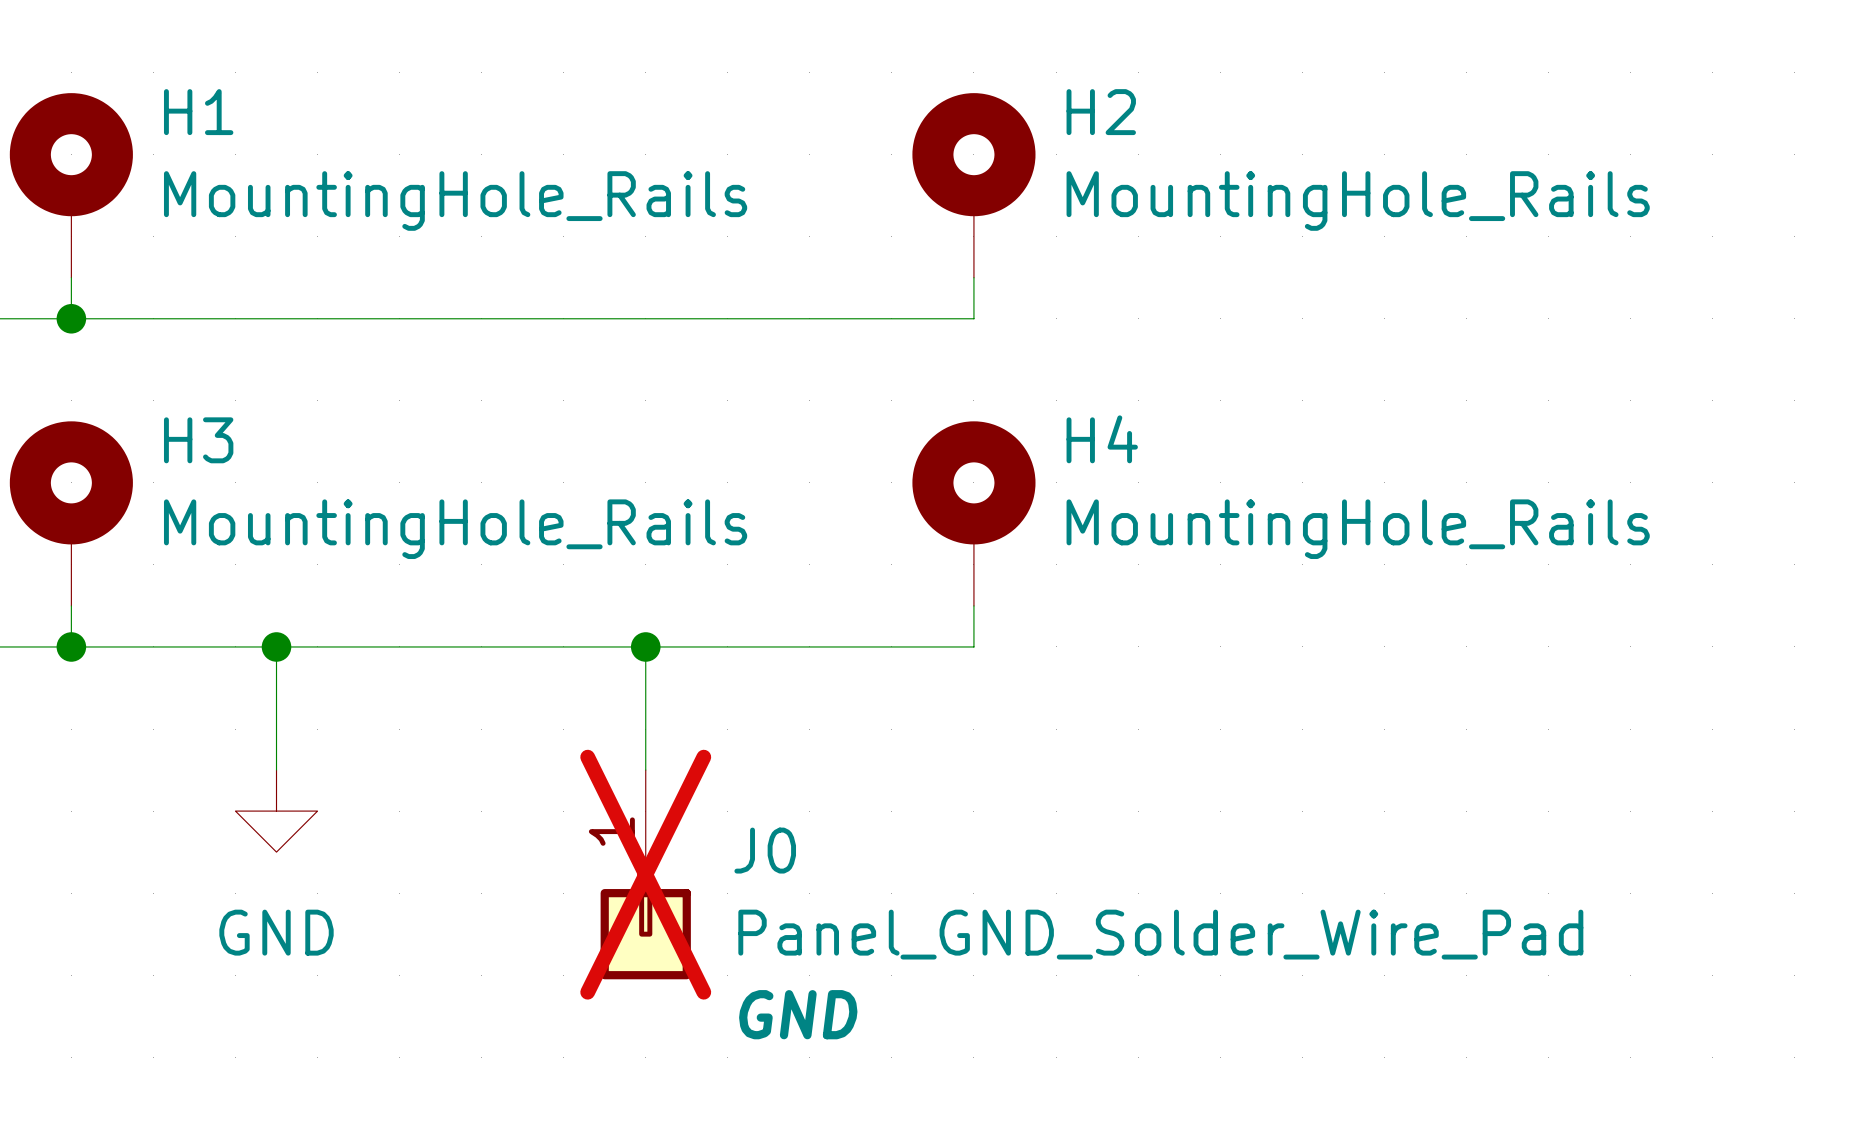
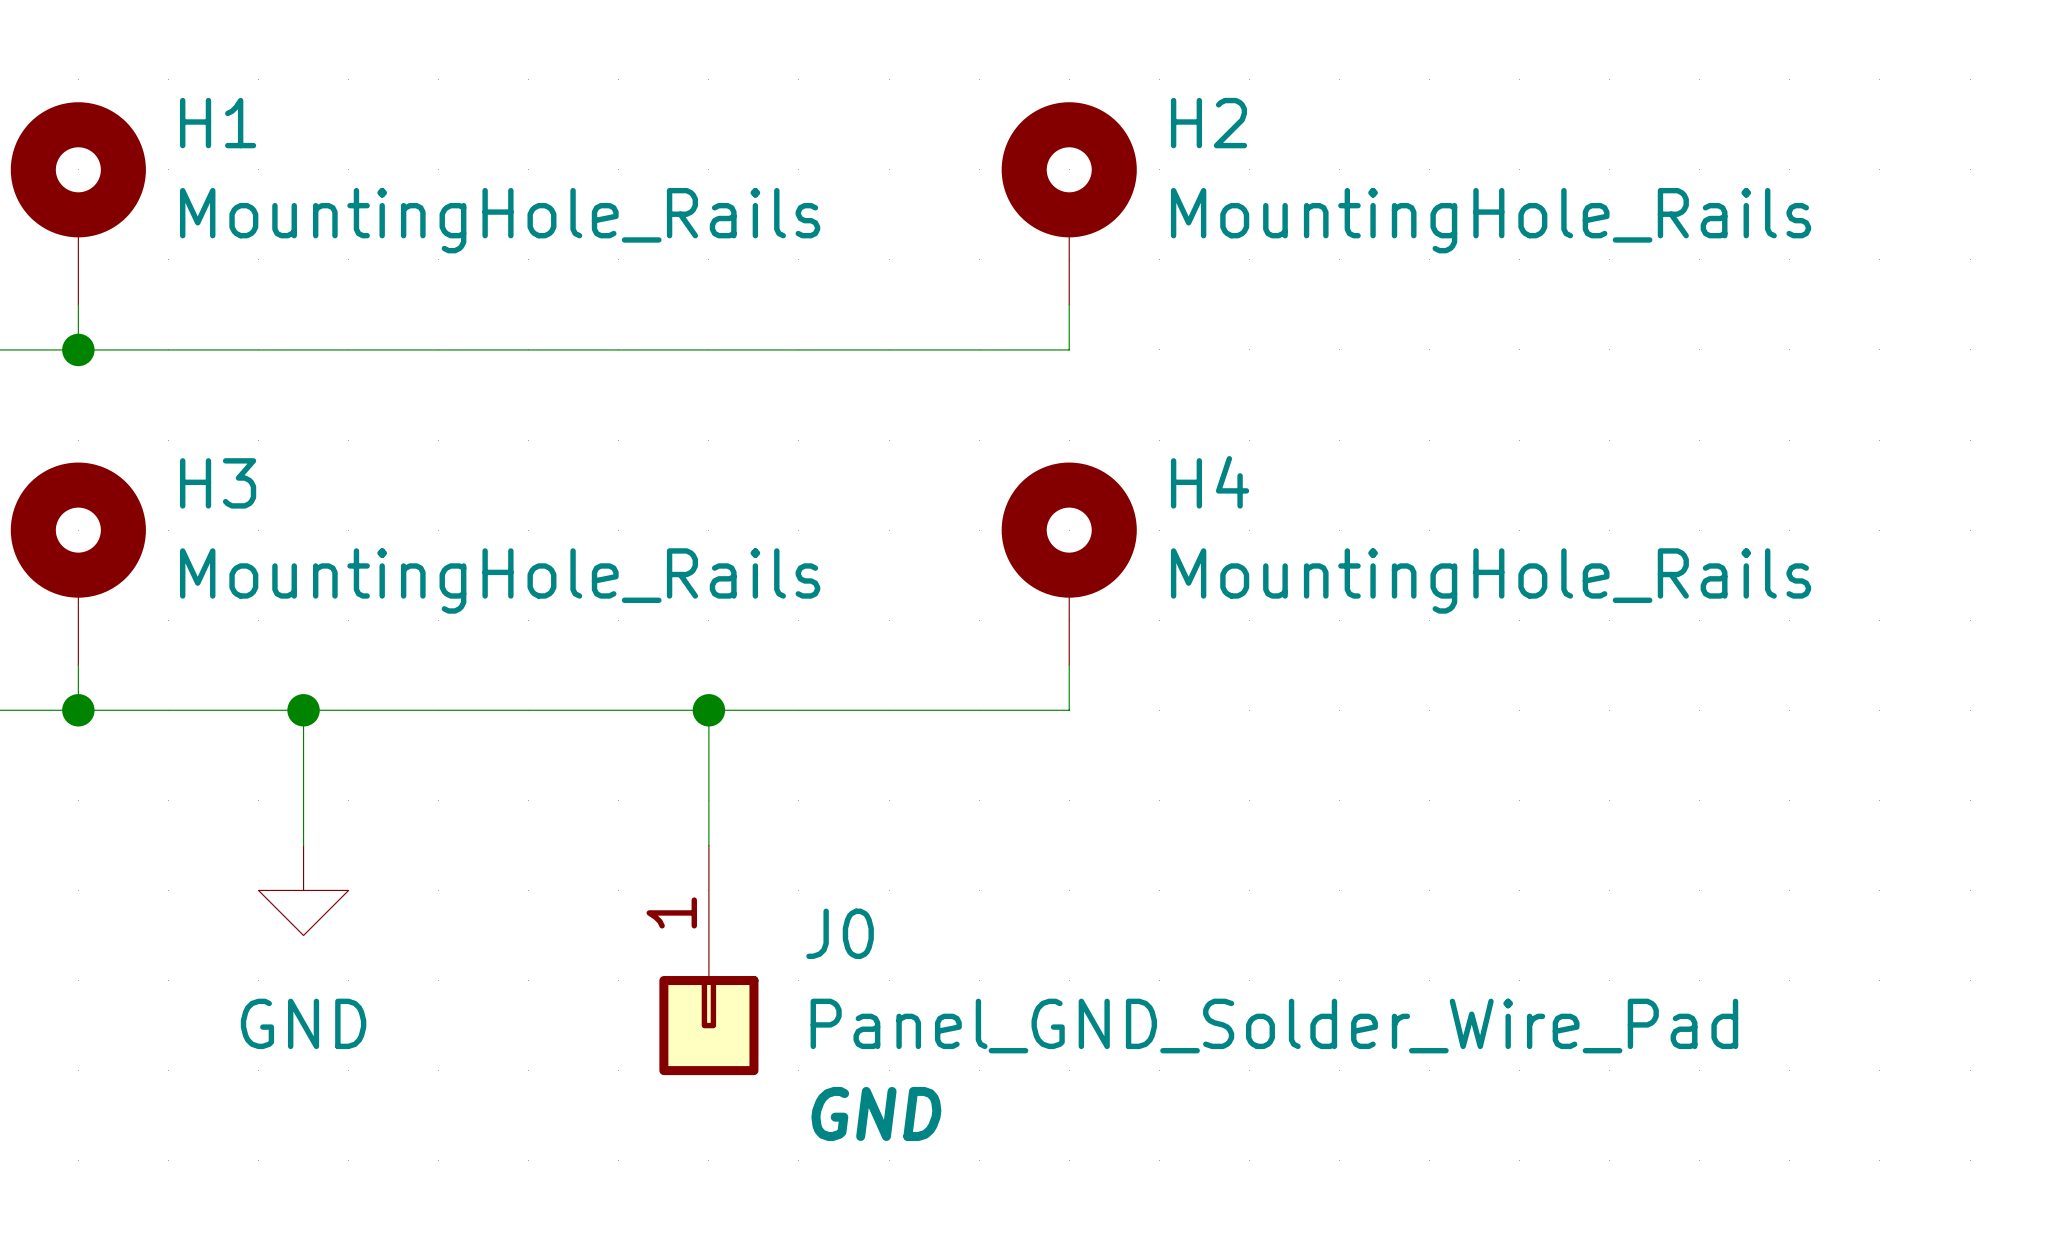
J0 do-not-place cross: (645, 874) -> none

